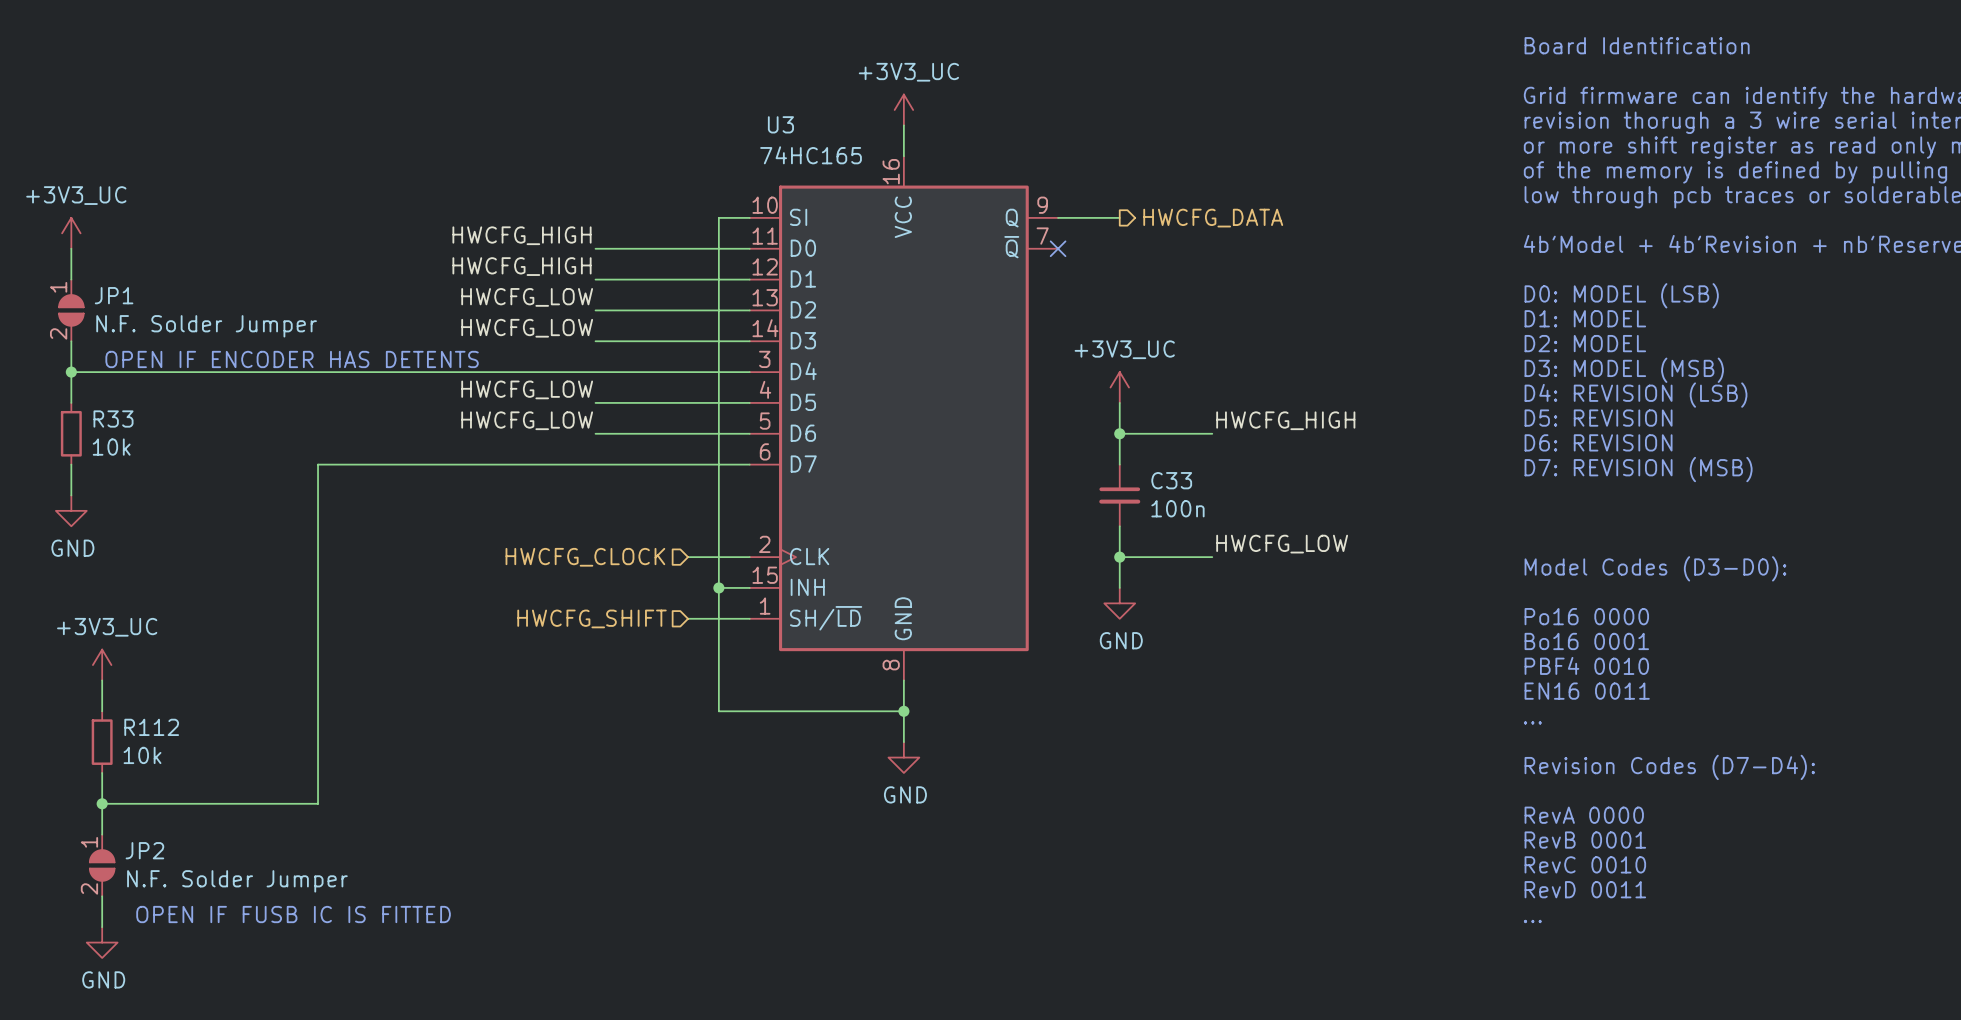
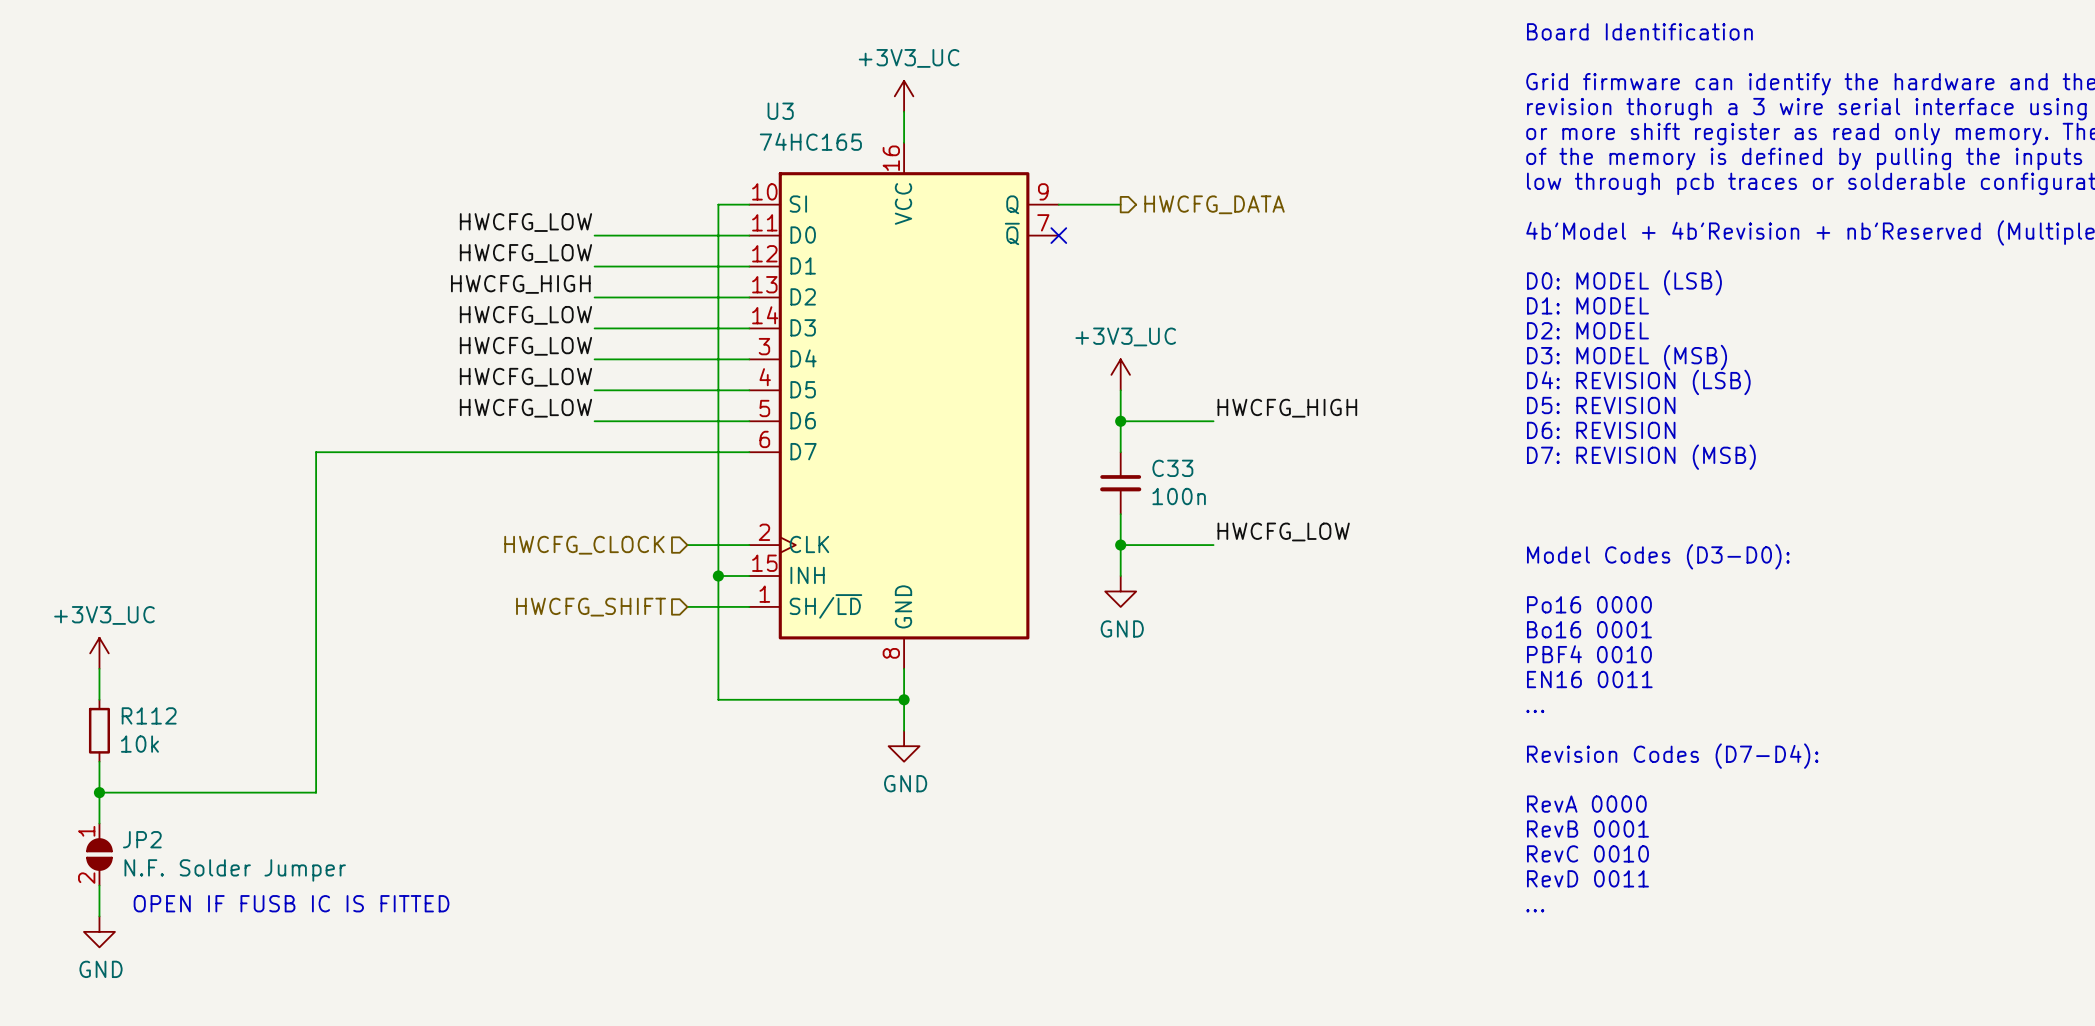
power symbol: +3V3_UC (71, 233) -> none
label: HWCFG_HIGH (522, 235) -> HWCFG_LOW (525, 222)
wire: (71, 248) (71, 279) -> none
label: HWCFG_HIGH (522, 266) -> HWCFG_LOW (525, 253)
label: HWCFG_LOW (527, 297) -> HWCFG_HIGH (520, 284)
JP1: N.F. Solder Jumper (71, 310) -> none
wire: (71, 341) (71, 402) -> none
text: OPEN IF ENCODER HAS DETENTS (292, 359) -> none
label: none -> HWCFG_LOW (525, 346)
wire: (71, 372) (595, 372) -> none
junction: (71, 372) -> none
R33: 10k (71, 433) -> none
wire: (71, 464) (71, 495) -> none
power symbol: GND (71, 510) -> none

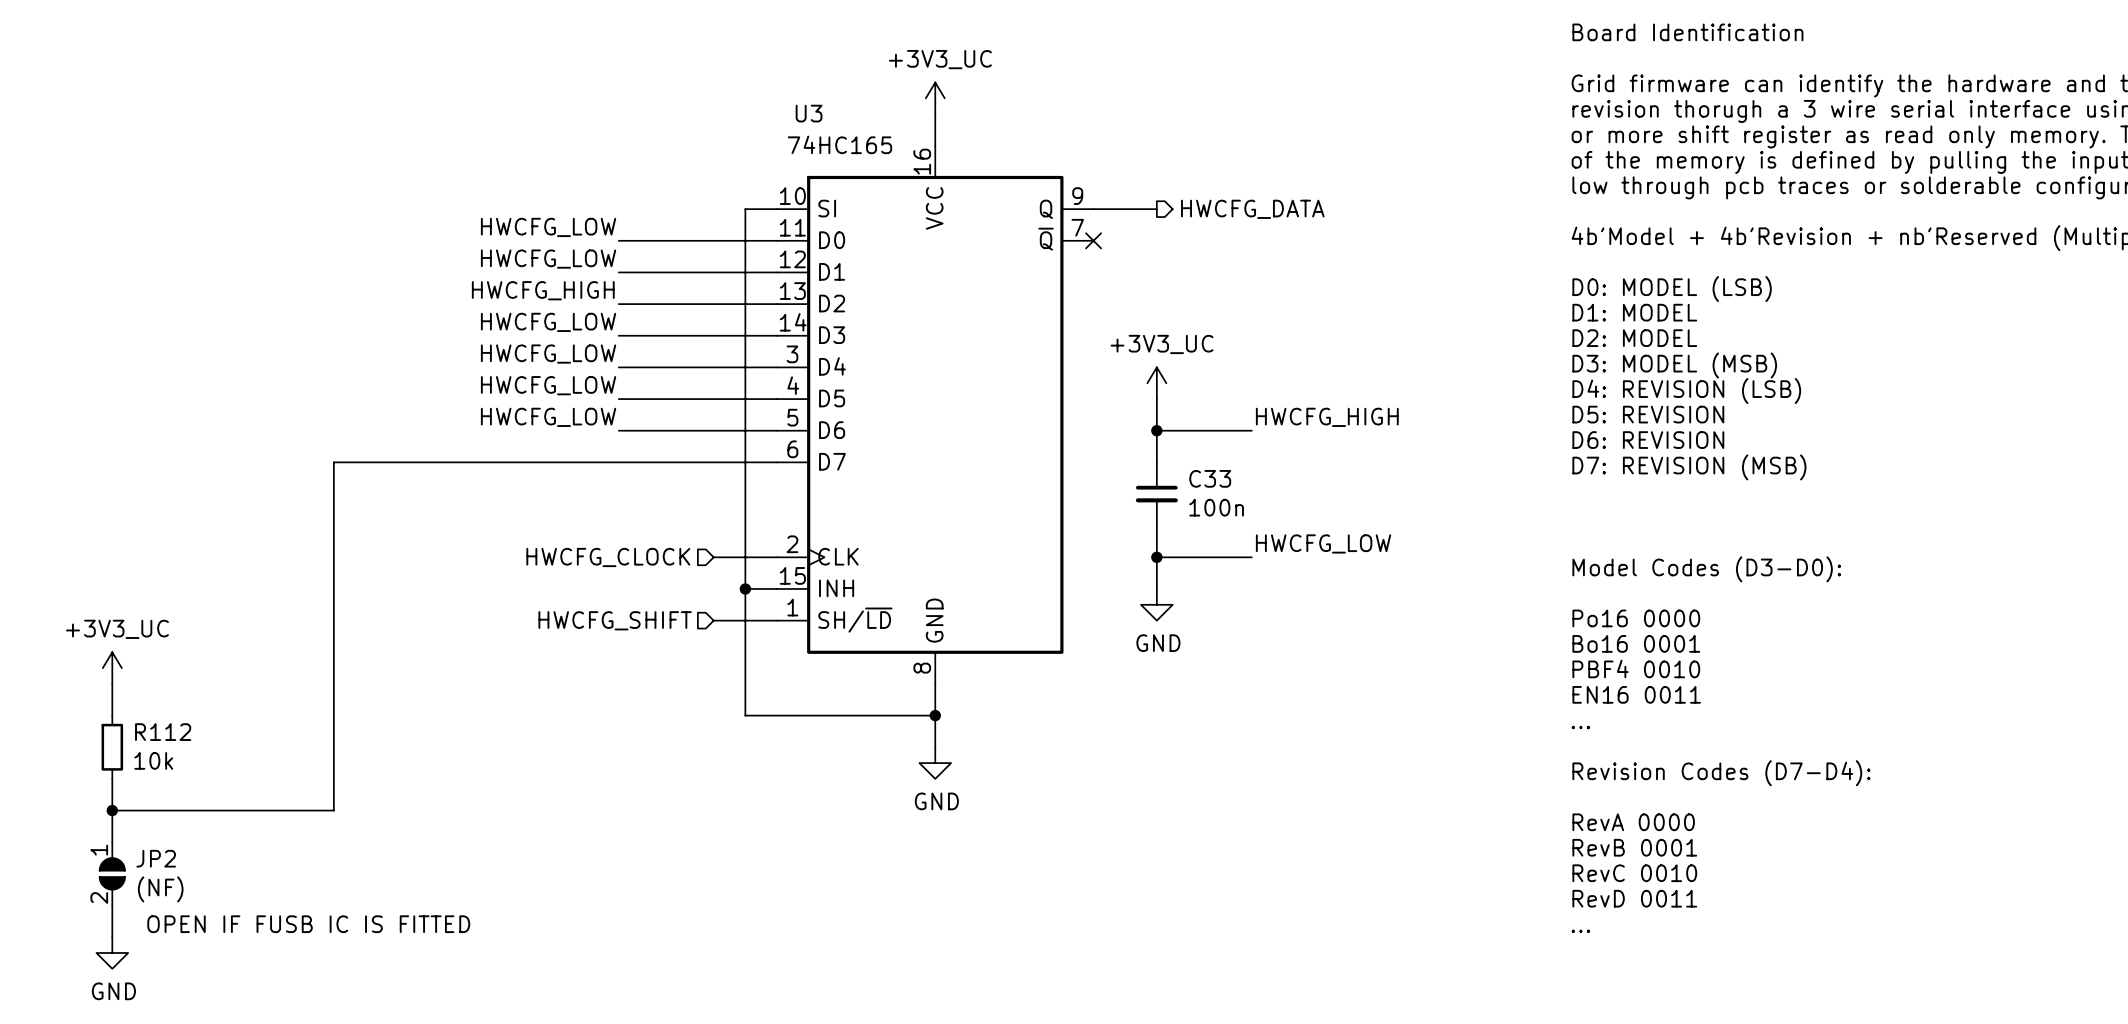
JP2 value: N.F. Solder Jumper (235, 870) -> (NF) (160, 889)

